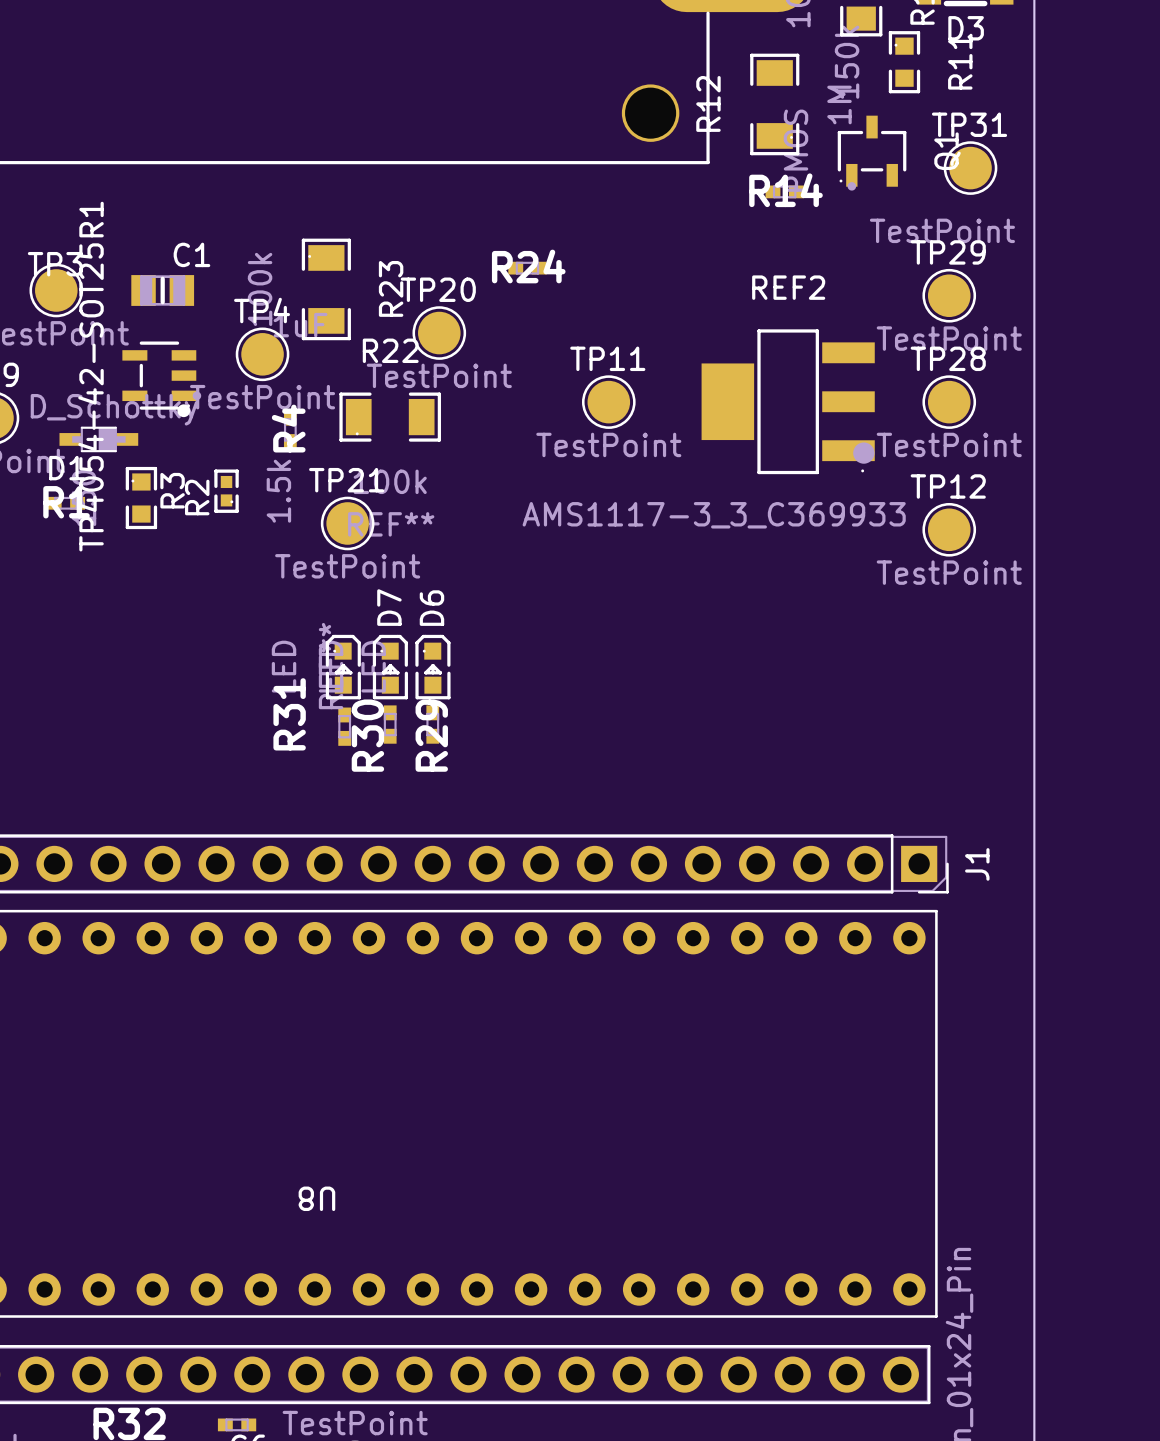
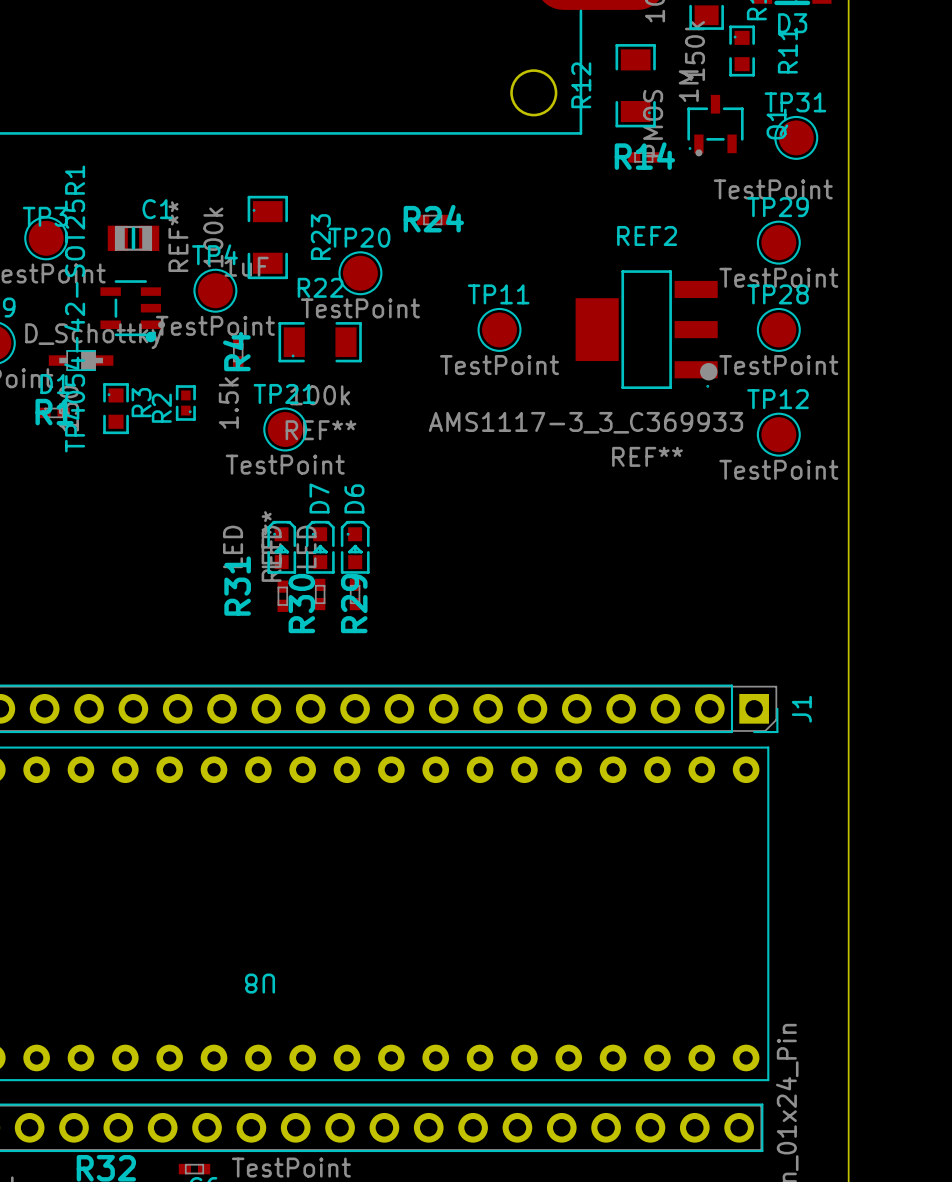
R23 text: none -> REF** (178, 236)
REF2 text: none -> REF** (647, 456)

